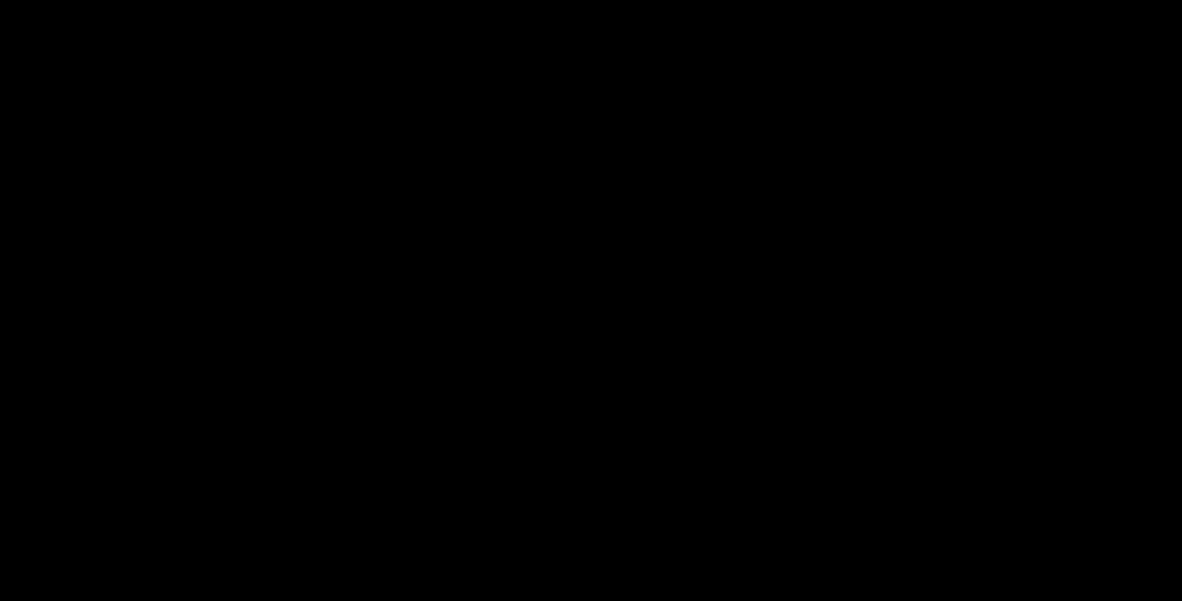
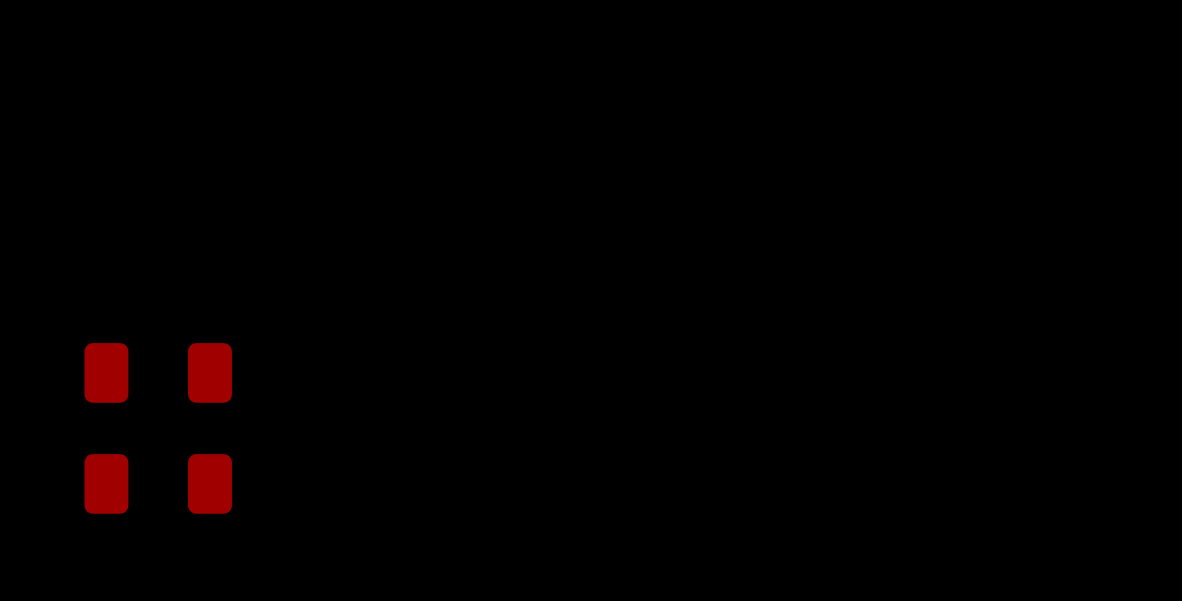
part: none -> (158, 372)
part: none -> (158, 483)

